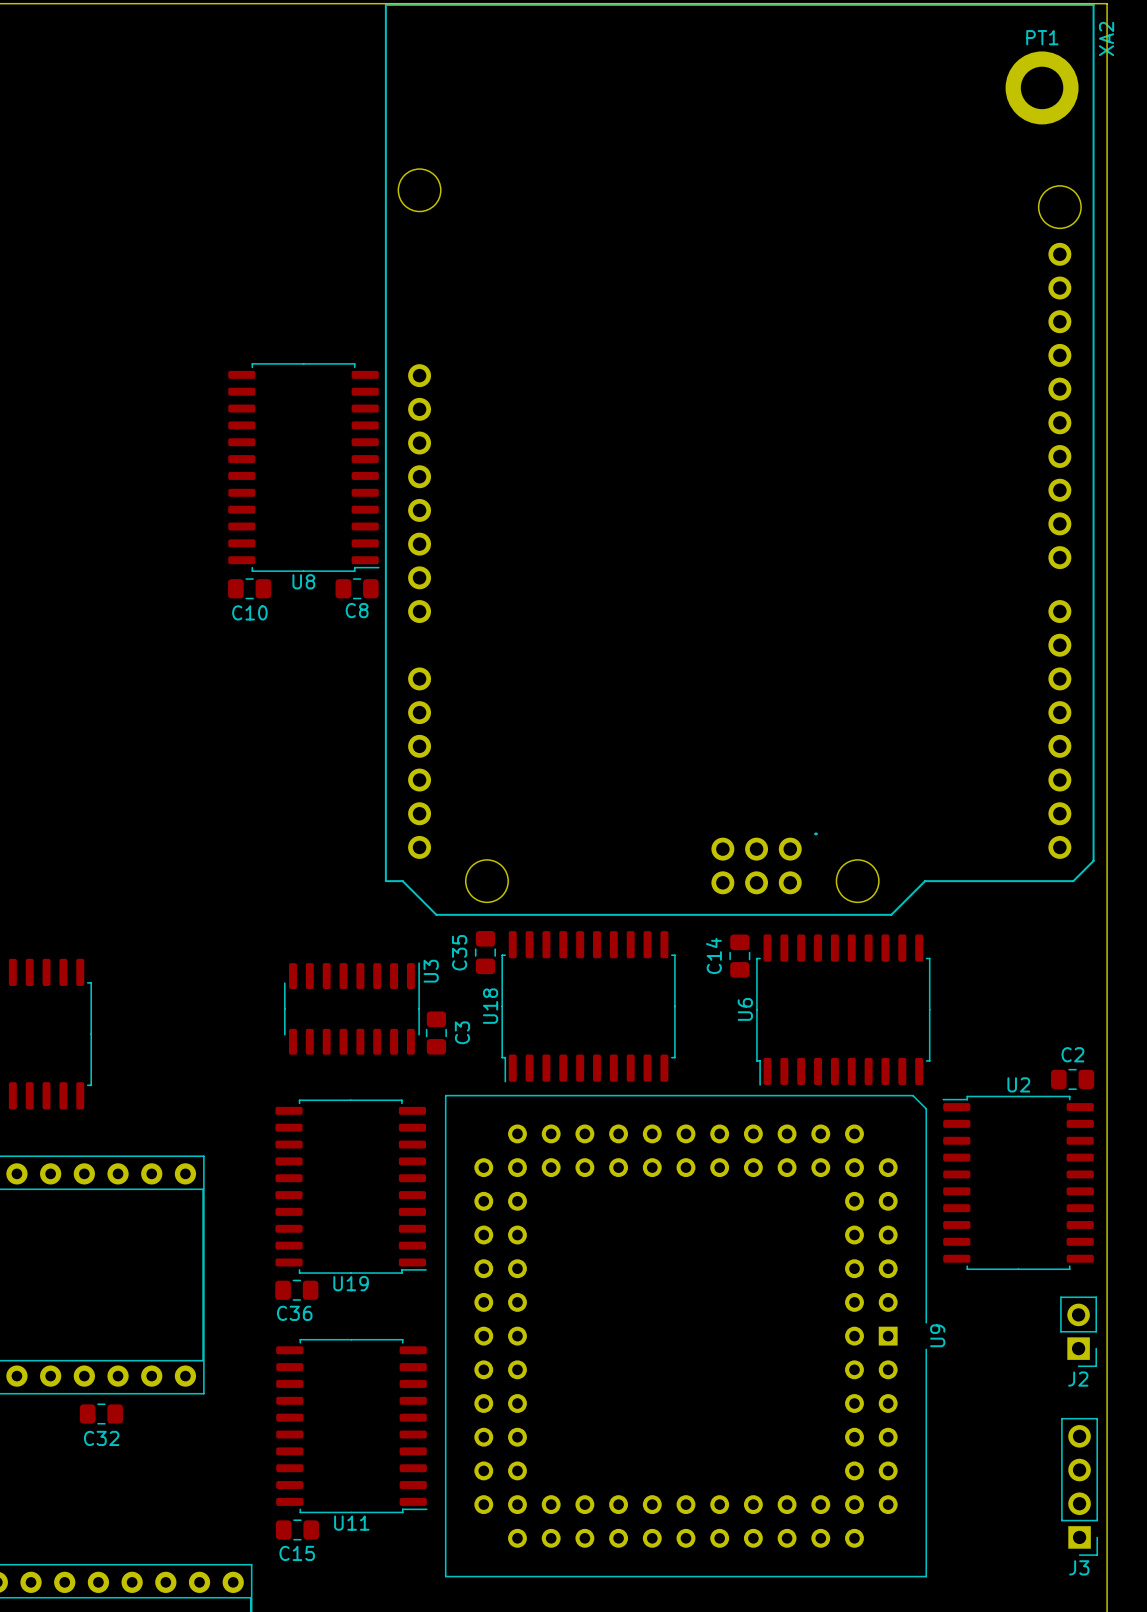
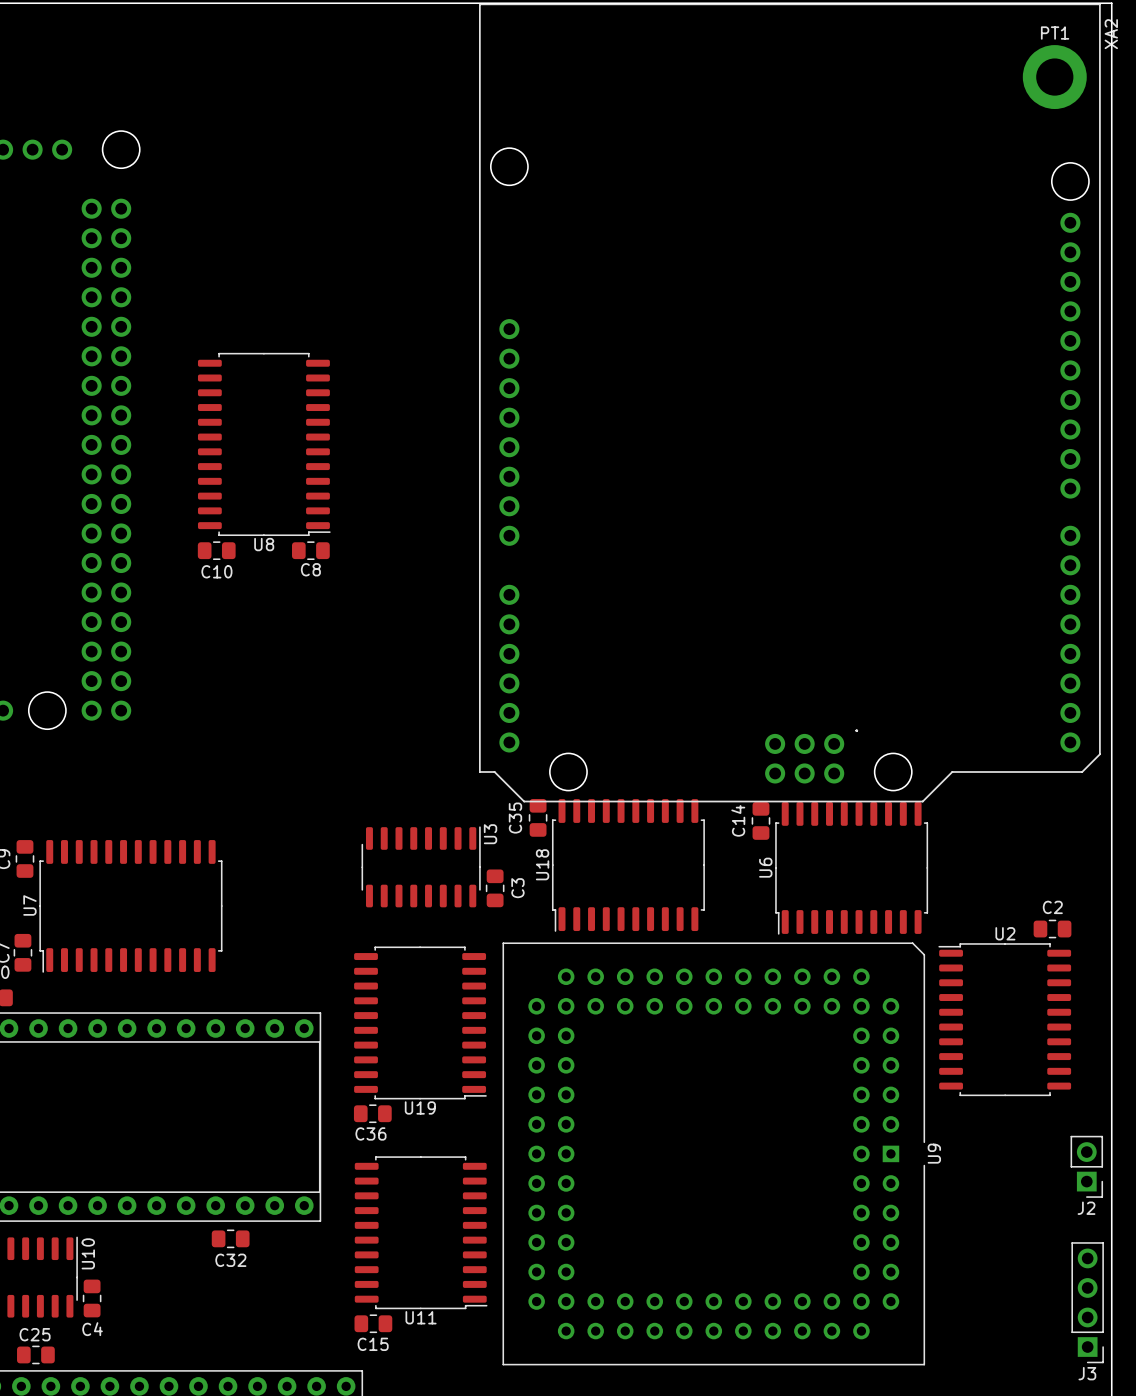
U8 position: (303, 467) -> (264, 444)
C10 position: (249, 588) -> (216, 550)
C8 position: (357, 588) -> (310, 550)
C35 position: (485, 952) -> (538, 817)
C14 position: (739, 956) -> (760, 820)
U18 position: (588, 1006) -> (628, 865)
U3 position: (351, 1008) -> (421, 866)
U6 position: (843, 1010) -> (851, 868)
C3 position: (436, 1033) -> (495, 888)
C2 position: (1072, 1079) -> (1052, 929)
U2 position: (1018, 1182) -> (1004, 1019)
U19 position: (351, 1186) -> (420, 1022)
C36 position: (296, 1290) -> (372, 1113)
U9 position: (685, 1336) -> (713, 1153)
U11 position: (351, 1426) -> (421, 1232)
C15 position: (297, 1529) -> (373, 1323)

